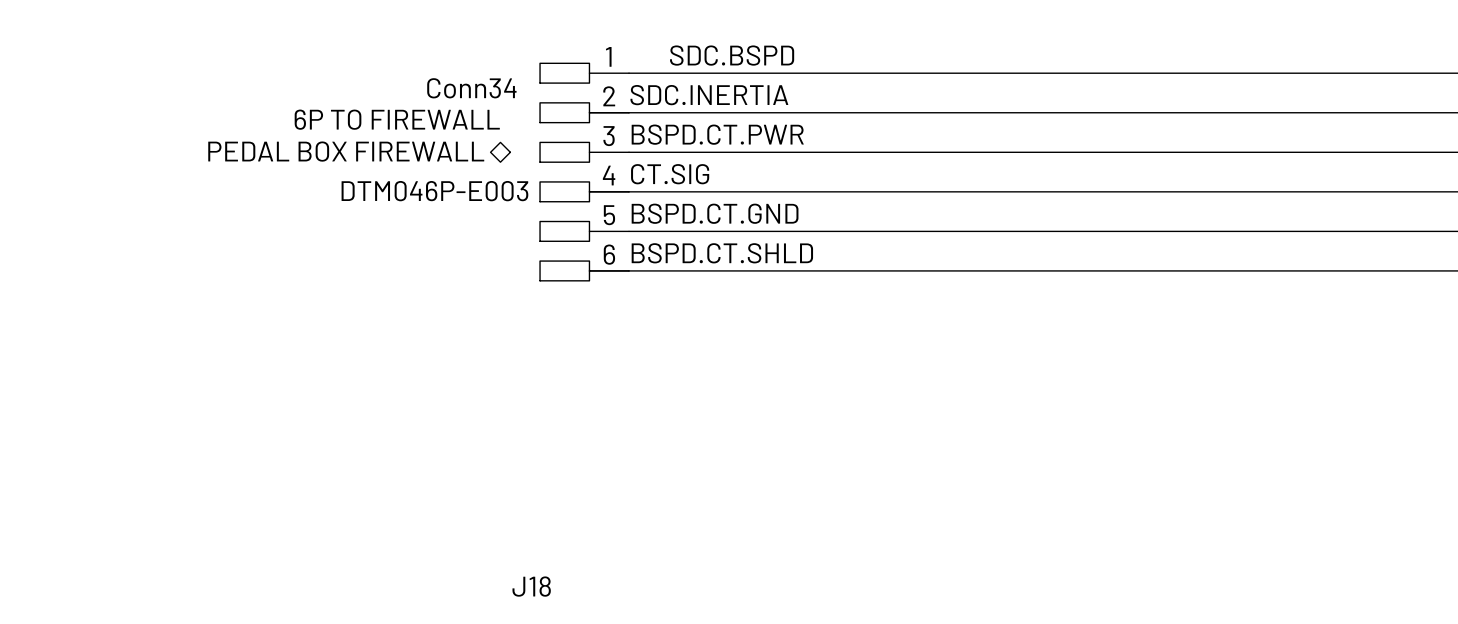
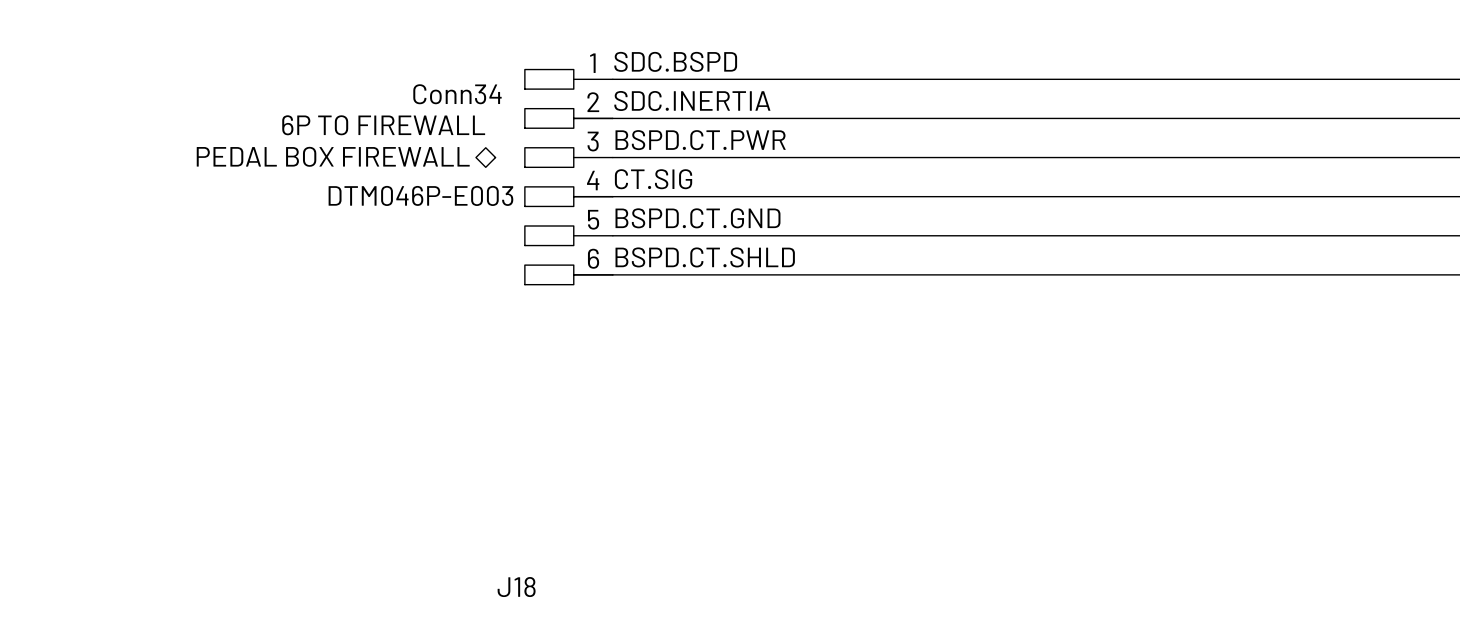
label position: SDC.BSPD (732, 55) -> SDC.BSPD (675, 61)

